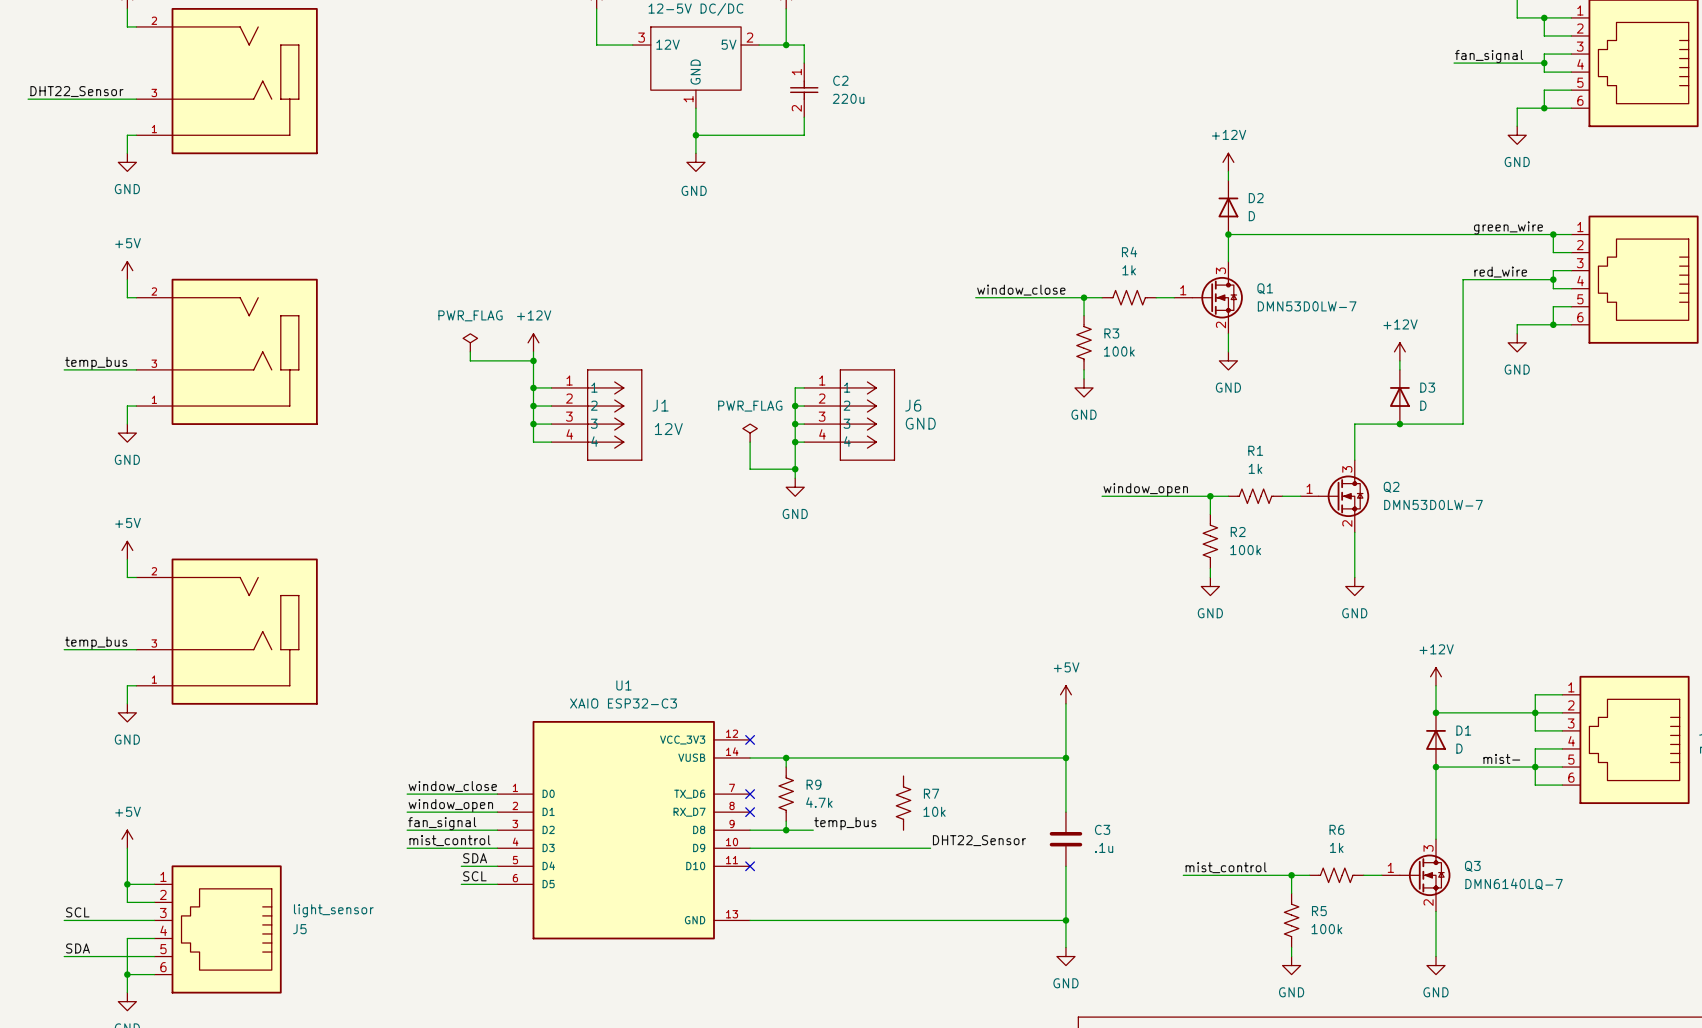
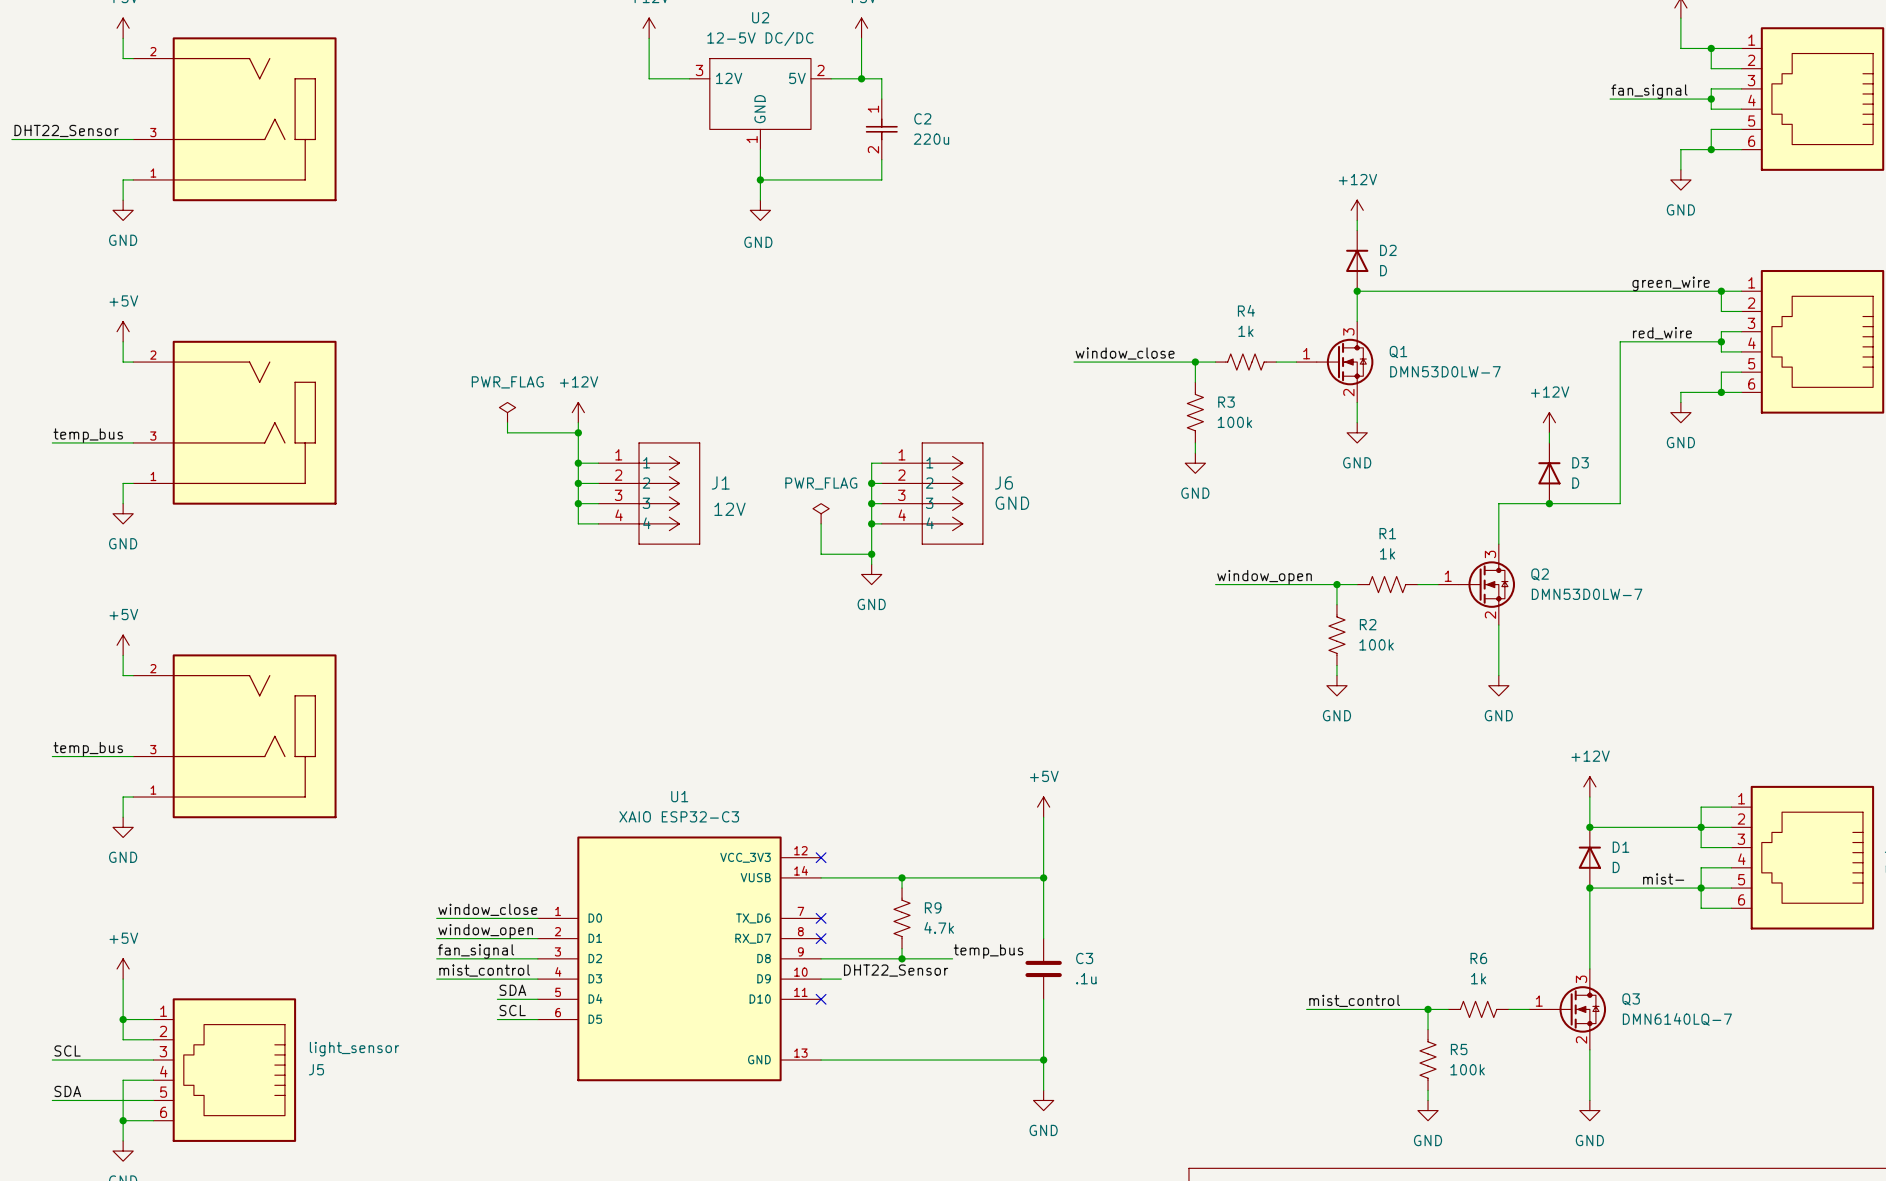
power symbol position: +5V (1065, 694) -> +5V (1043, 807)
wire: (1065, 703) (1065, 812) -> (1043, 817) (1043, 938)
wire: (786, 757) (786, 767) -> (902, 877) (902, 888)
junction position: (786, 757) -> (902, 877)
wire: (948, 757) (1065, 757) -> none
junction: none -> (1043, 877)
junction: (1065, 757) -> none
R9 position: (786, 794) -> (902, 918)
R7: 10k (903, 803) -> none
wire: (786, 821) (786, 830) -> (902, 948) (902, 958)
label position: temp_bus (845, 823) -> temp_bus (988, 951)
junction position: (786, 830) -> (902, 958)
wire: none -> (891, 958) (952, 958)
C3 position: (1065, 839) -> (1043, 968)
label position: DHT22_Sensor (979, 840) -> DHT22_Sensor (896, 970)
wire: (768, 848) (930, 848) -> none
wire: (1065, 866) (1065, 947) -> (1043, 999) (1043, 1090)
wire: (948, 920) (1065, 920) -> none
junction: none -> (1043, 1060)
junction: (1065, 920) -> none
power symbol position: GND (1065, 956) -> GND (1043, 1100)

